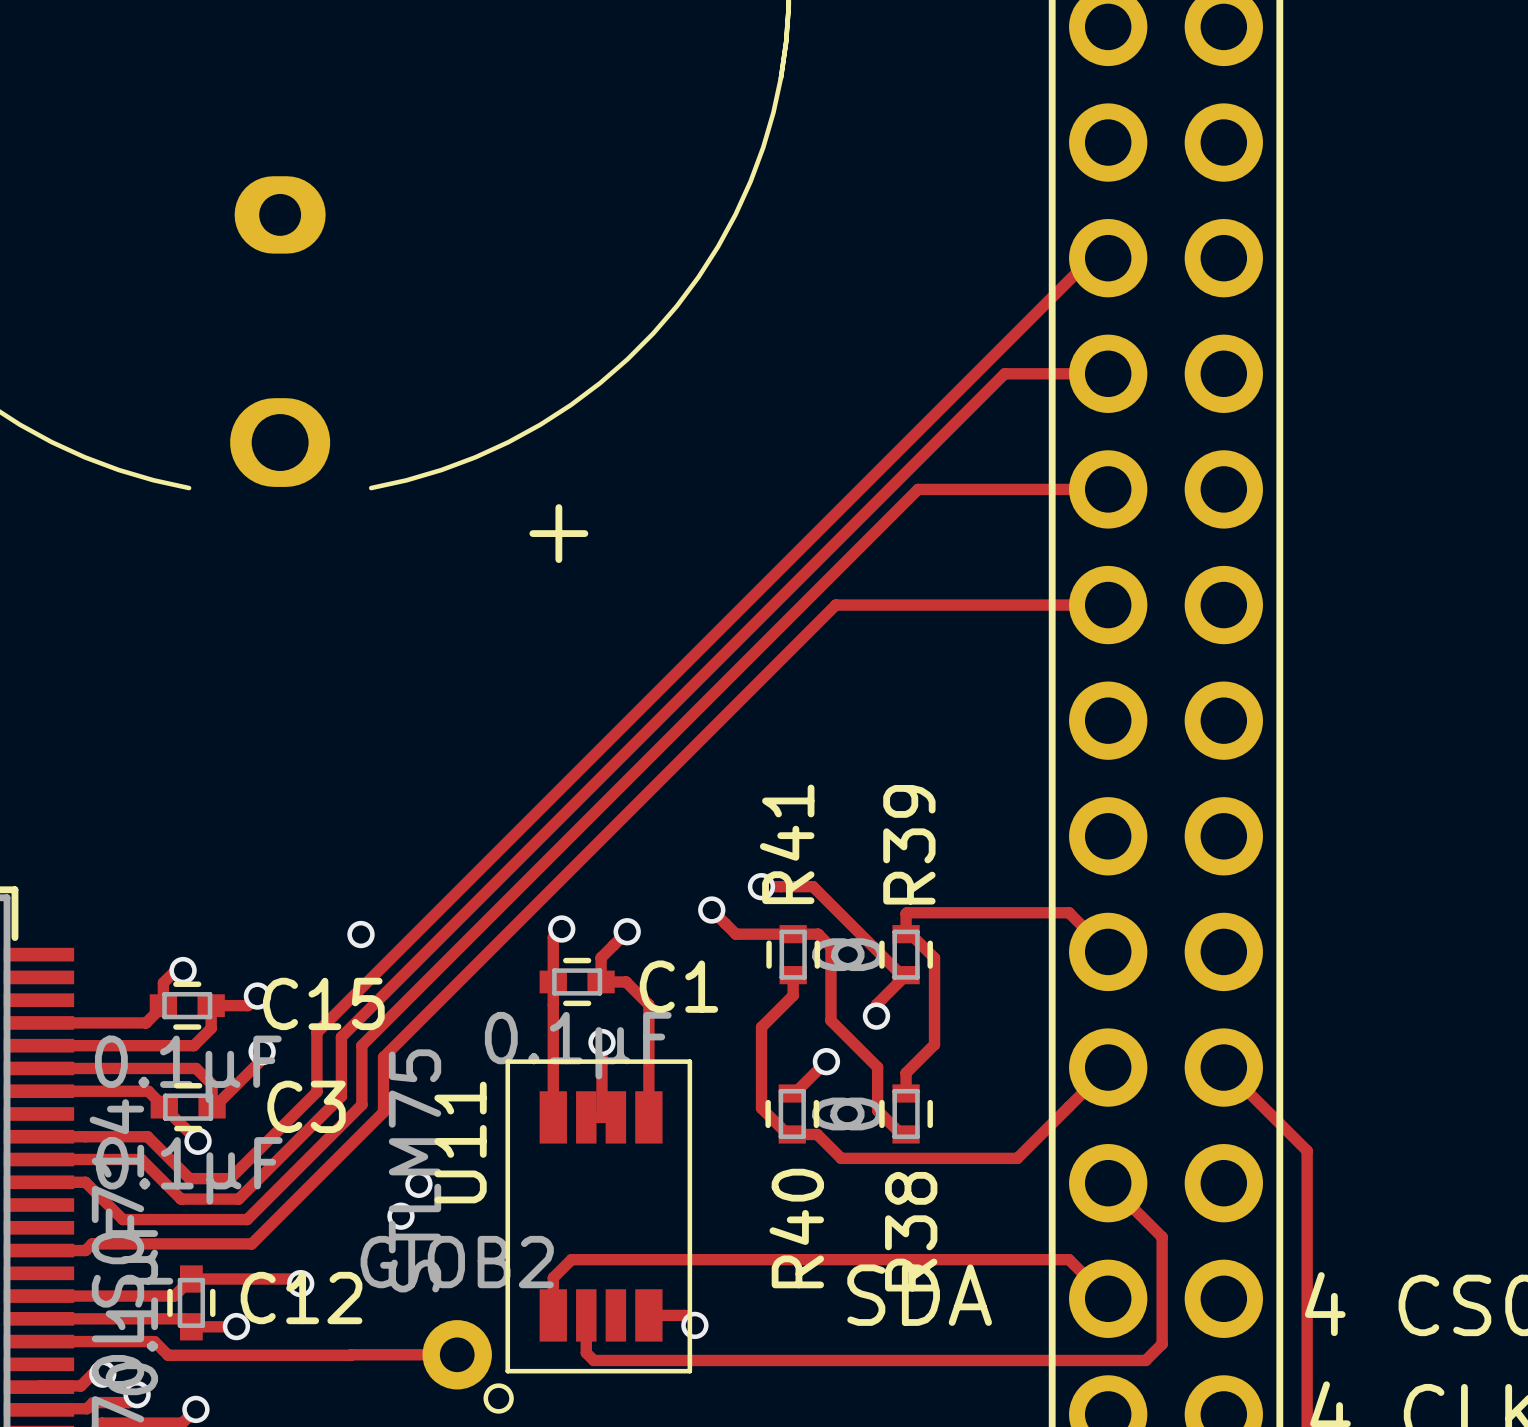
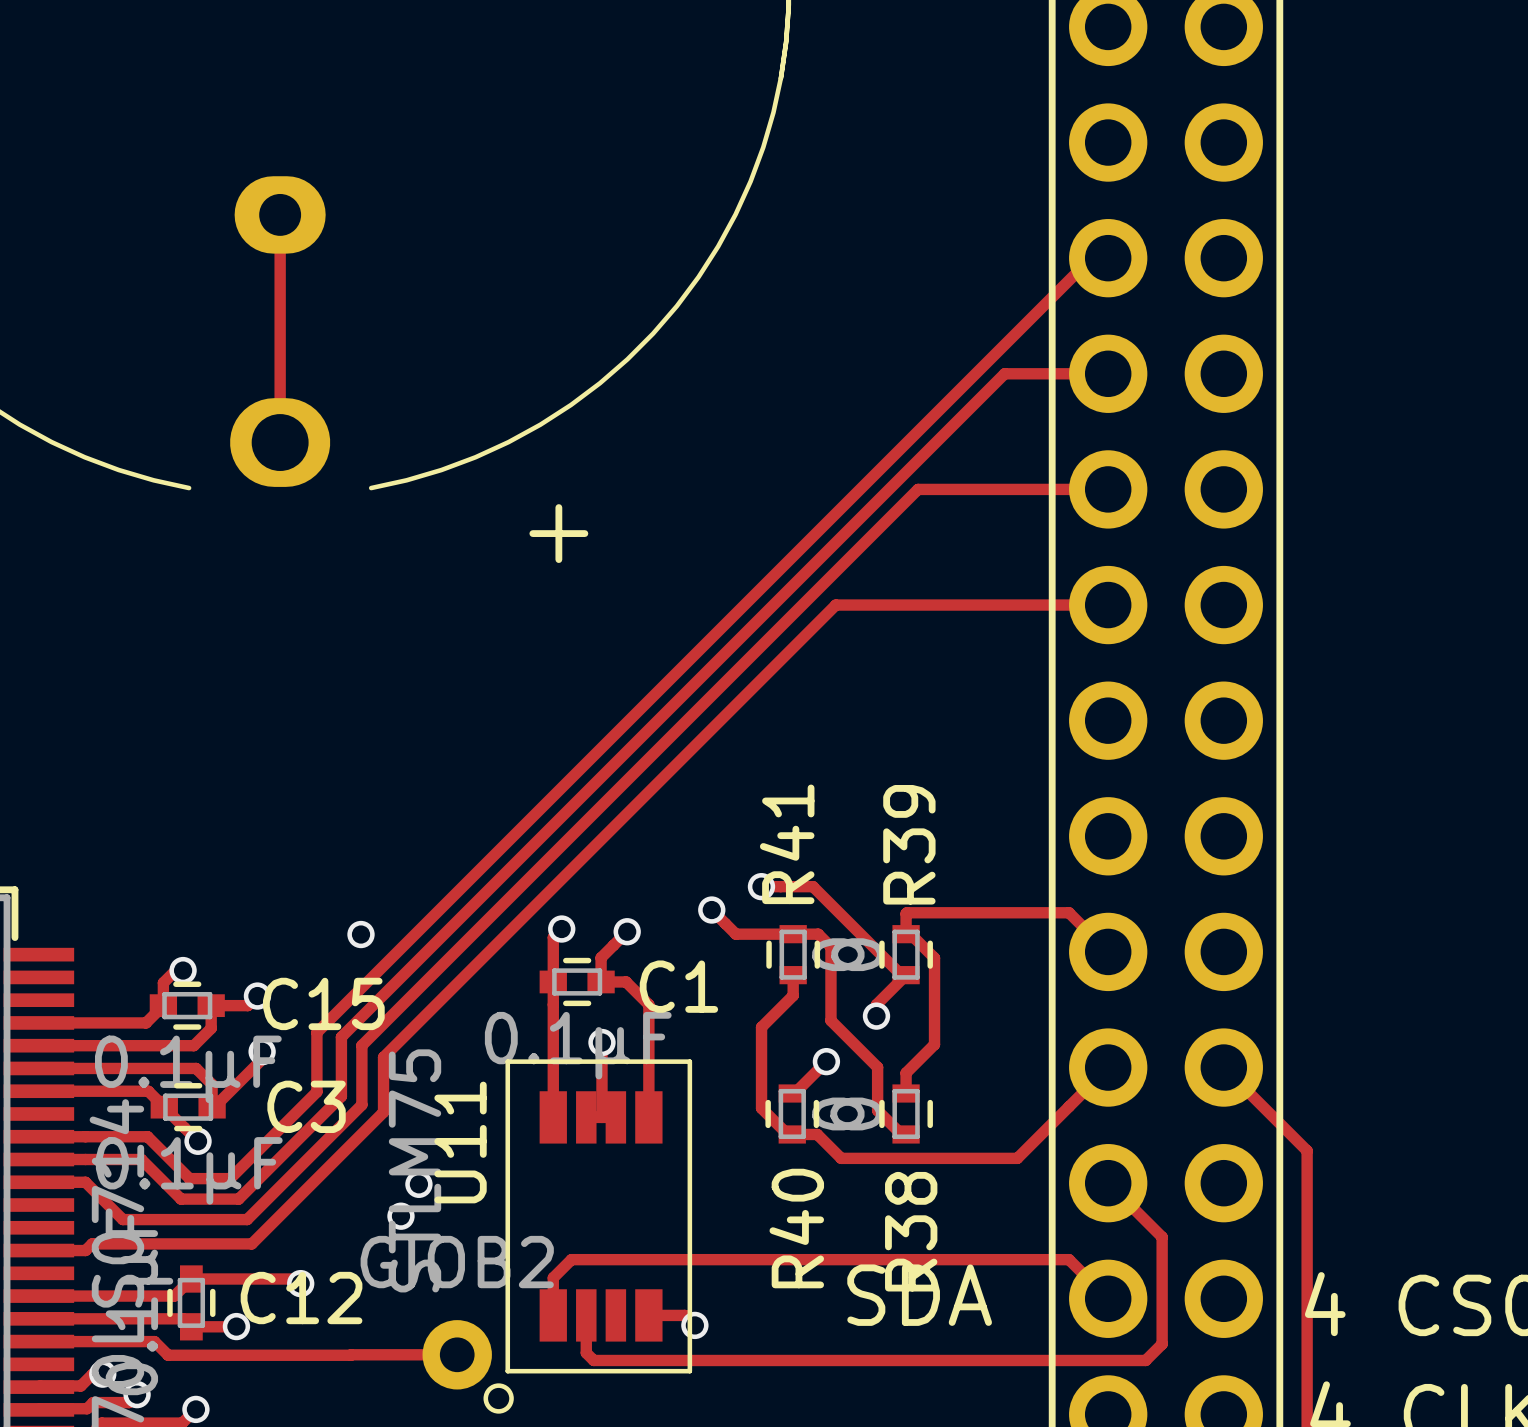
track: none -> (280, 214) (280, 442)

